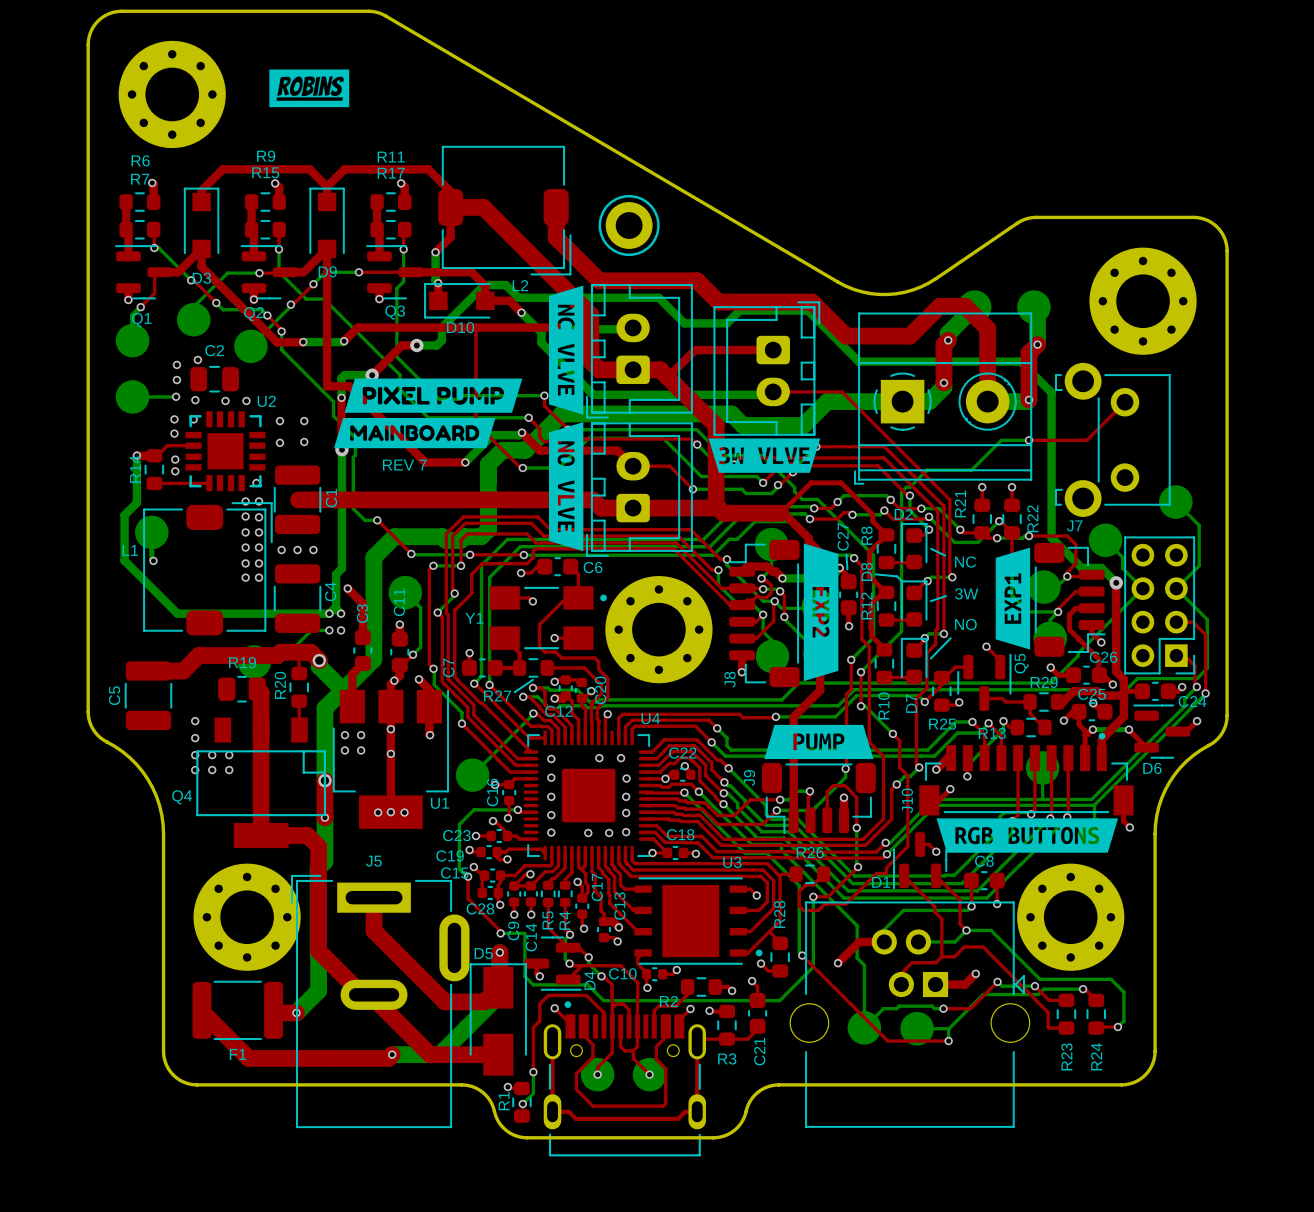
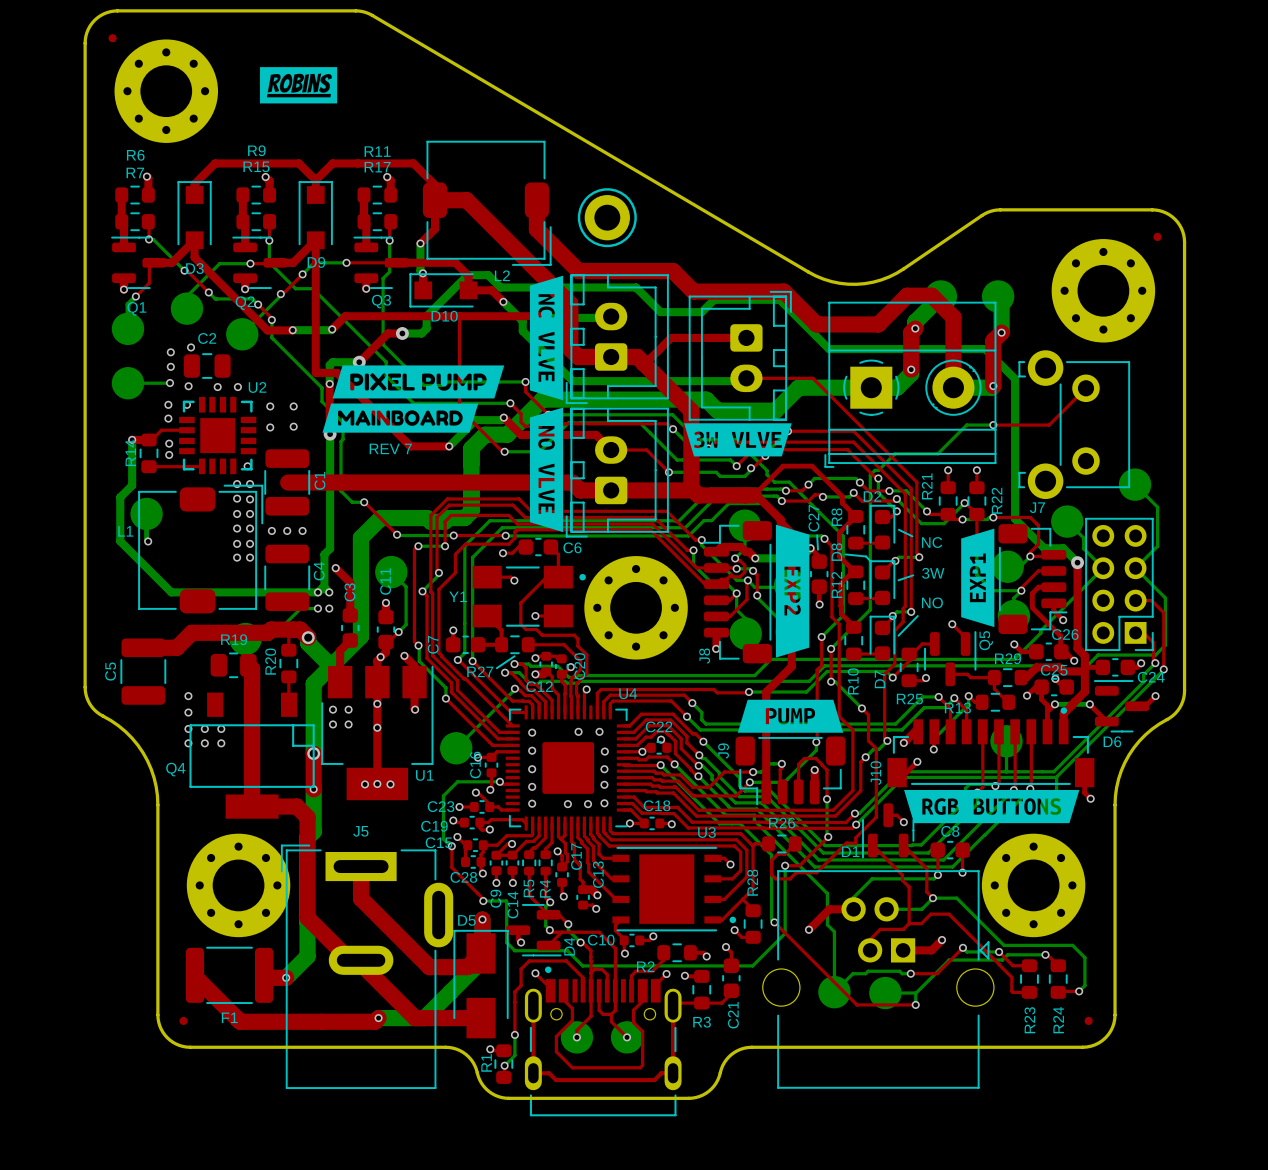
part: none -> (112, 38)
part: none -> (1157, 236)
part: none -> (183, 1020)
part: none -> (1088, 1020)

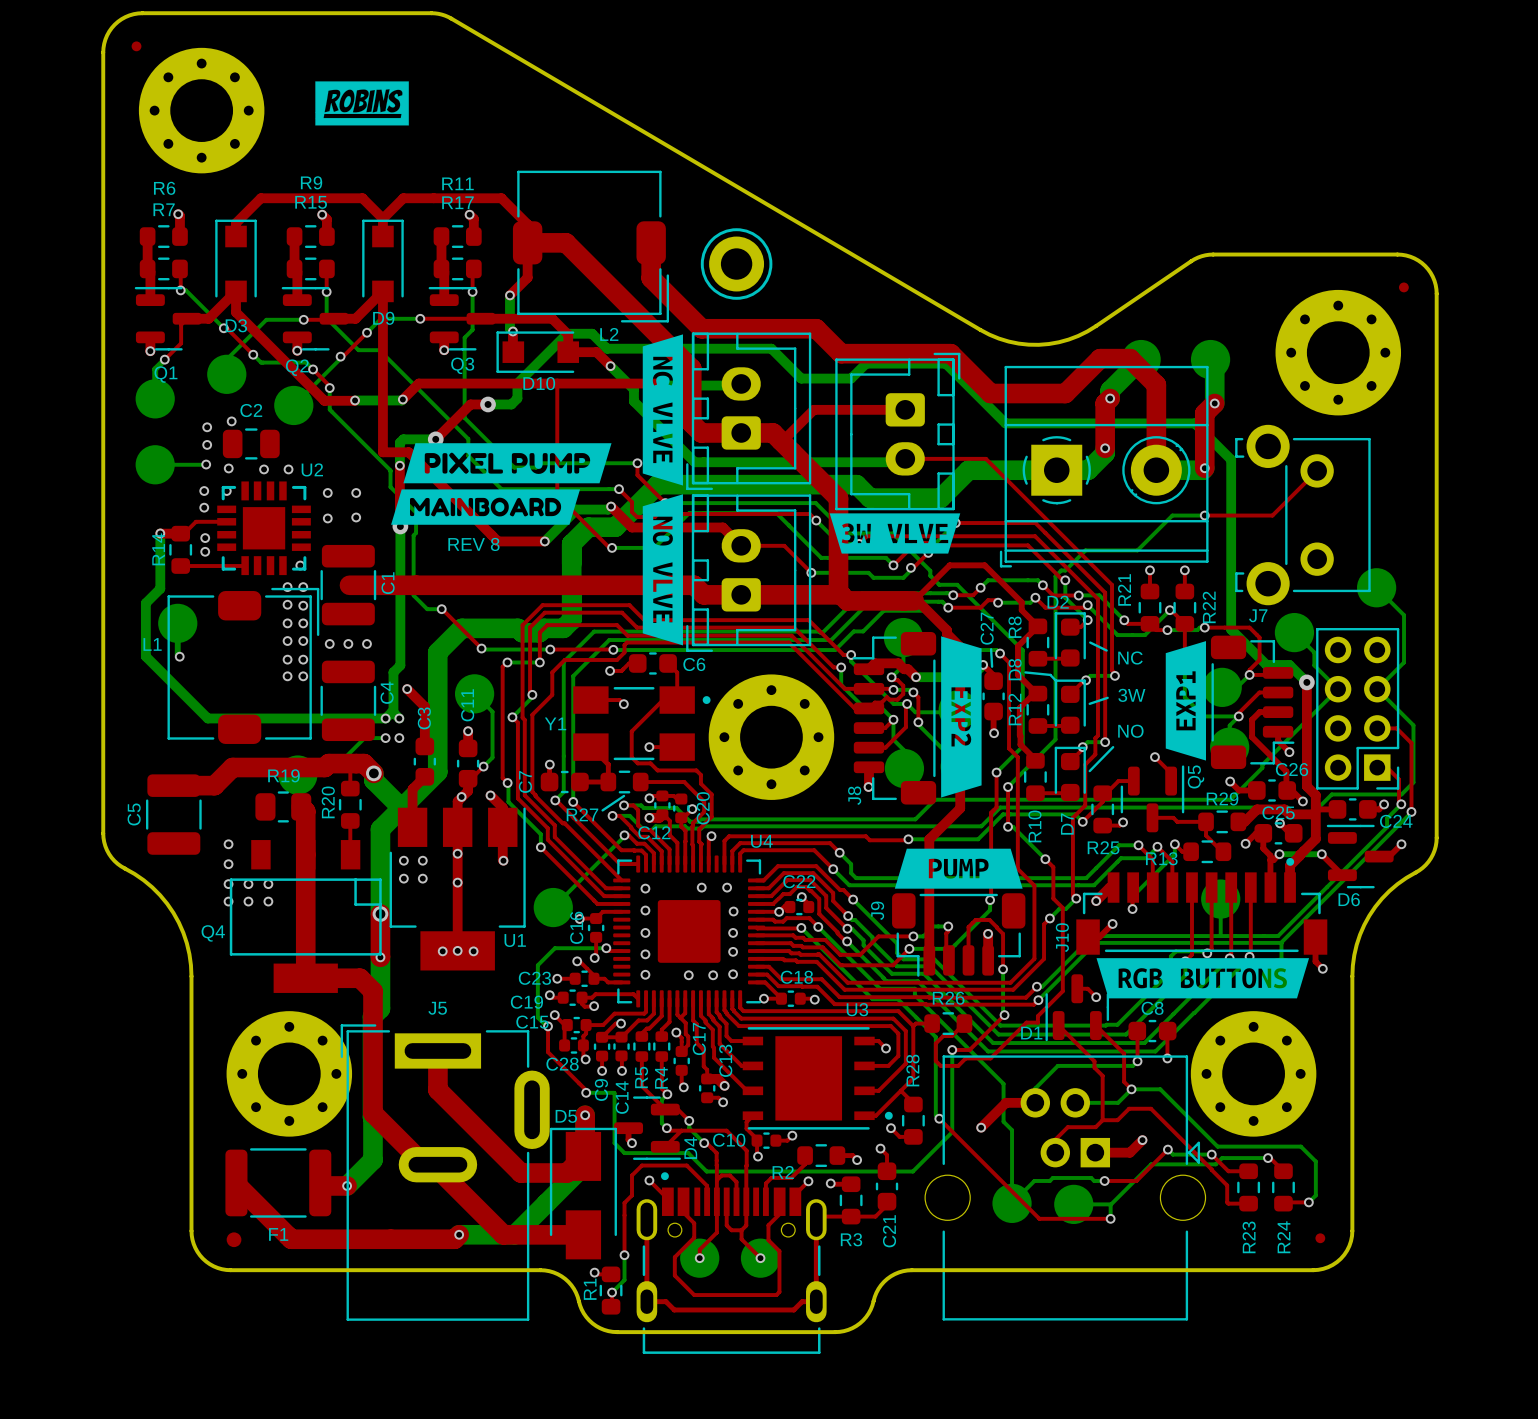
text: REV 7 (390, 448) -> REV 8 (473, 544)
part footprint: [179, 1016, 188, 1025] -> [226, 1232, 242, 1248]

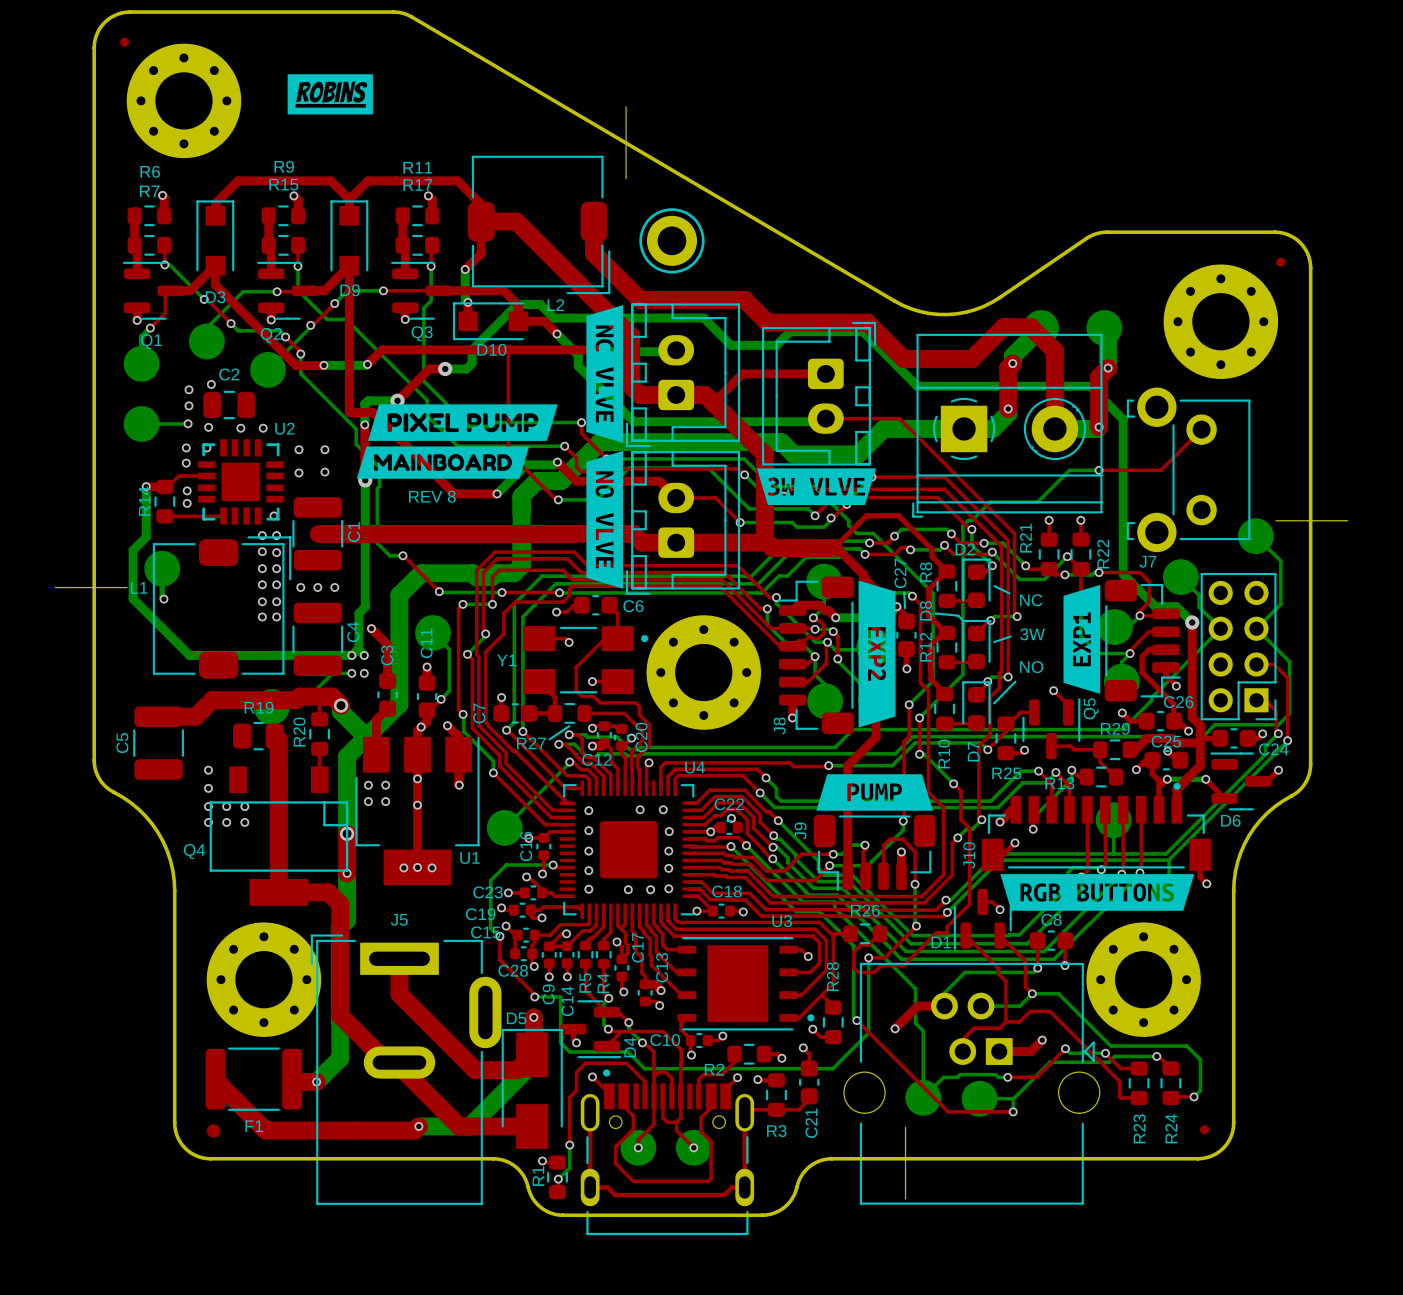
board edge: none -> (626, 106) (626, 178)
board edge: none -> (1275, 520) (1347, 520)
board edge: none -> (55, 587) (127, 587)
board edge: none -> (905, 1127) (905, 1199)

